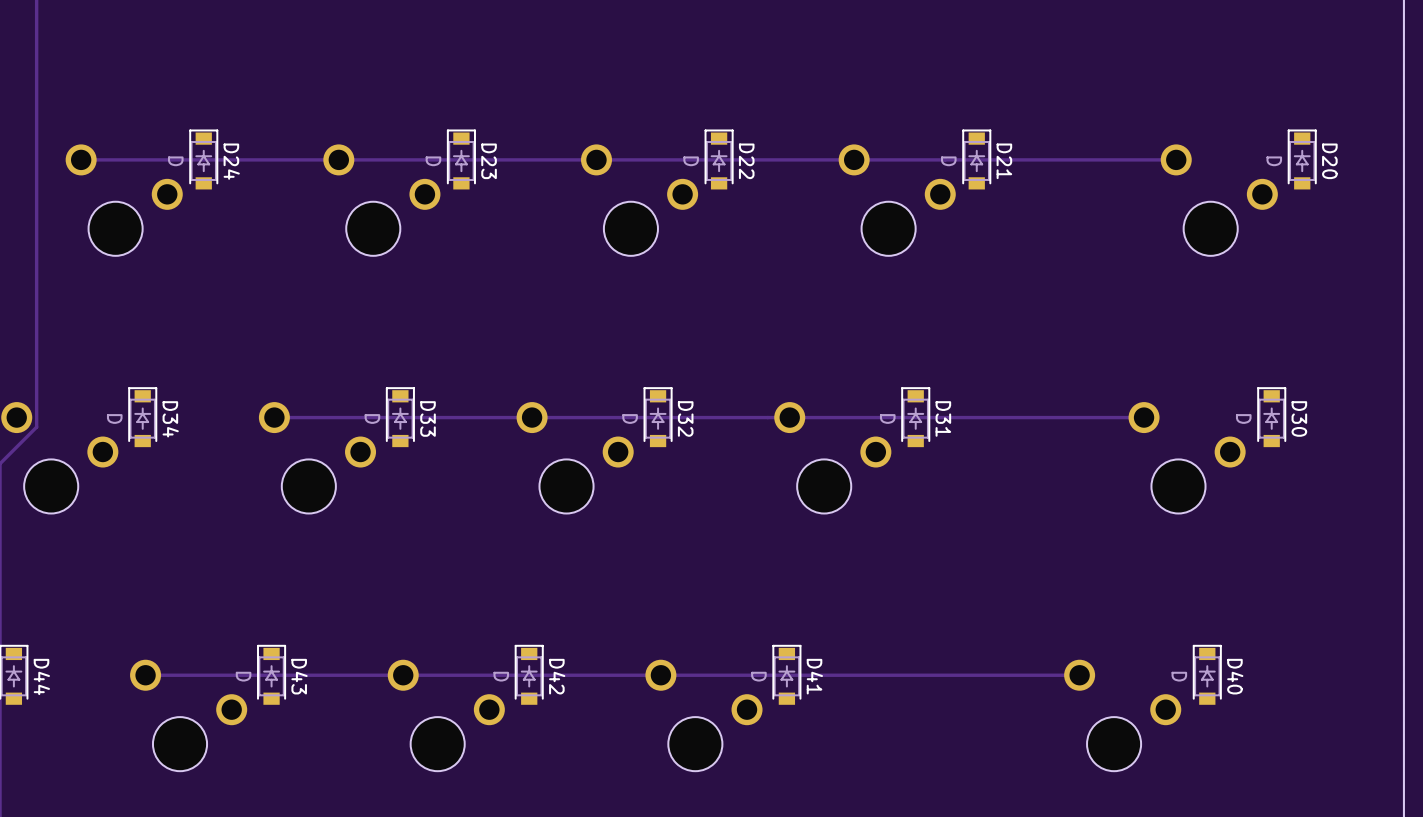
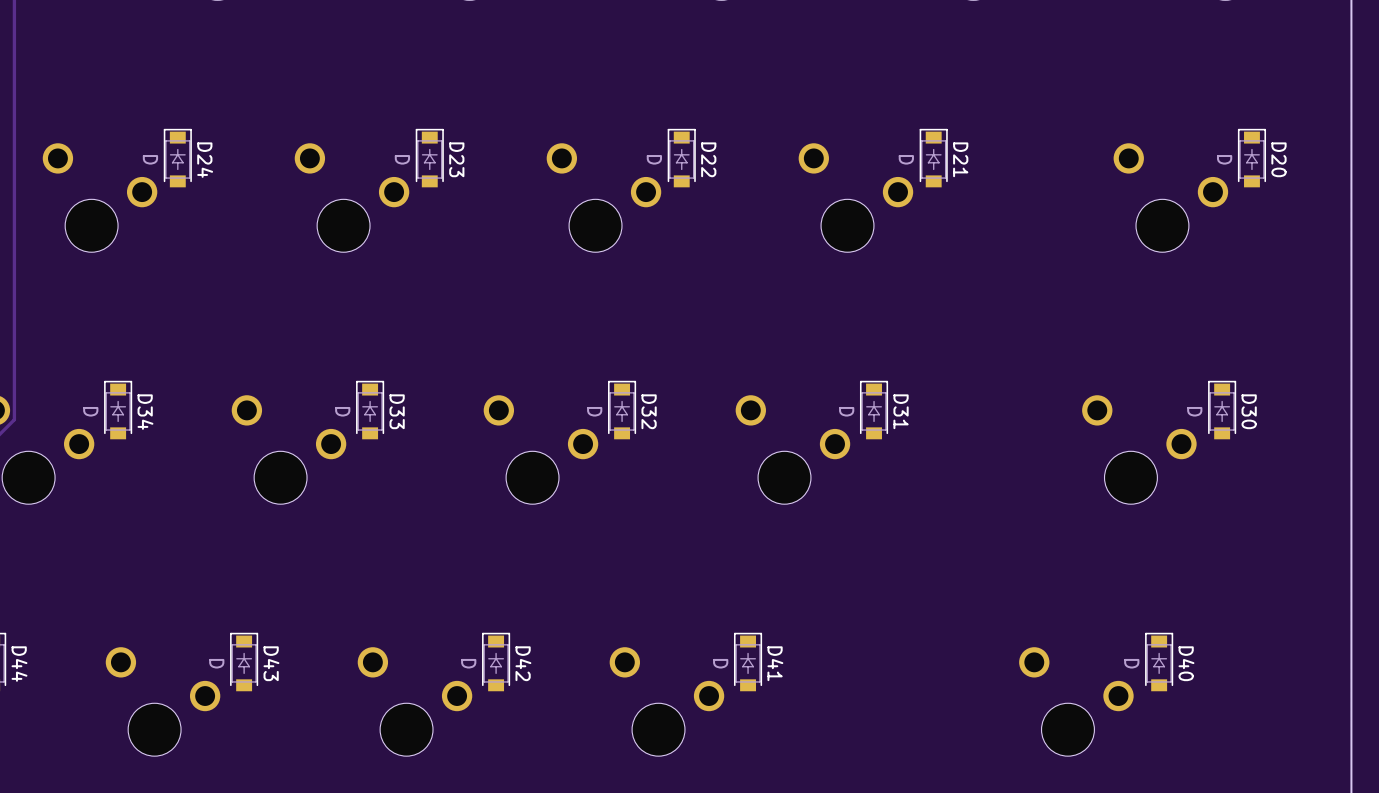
track: (1176, 159) (81, 159) -> none
track: (1144, 417) (274, 417) -> none
track: (1079, 675) (145, 675) -> none

